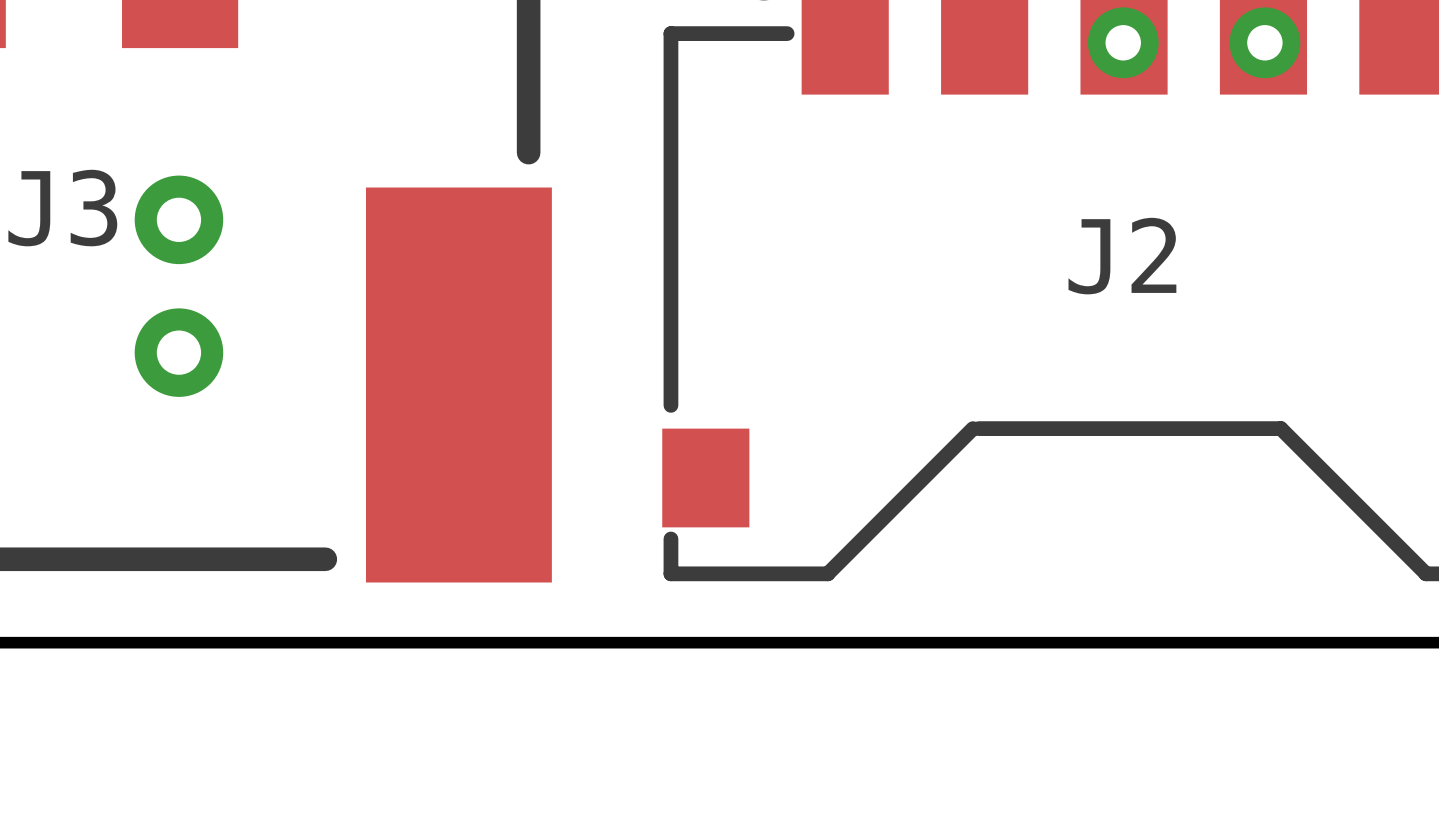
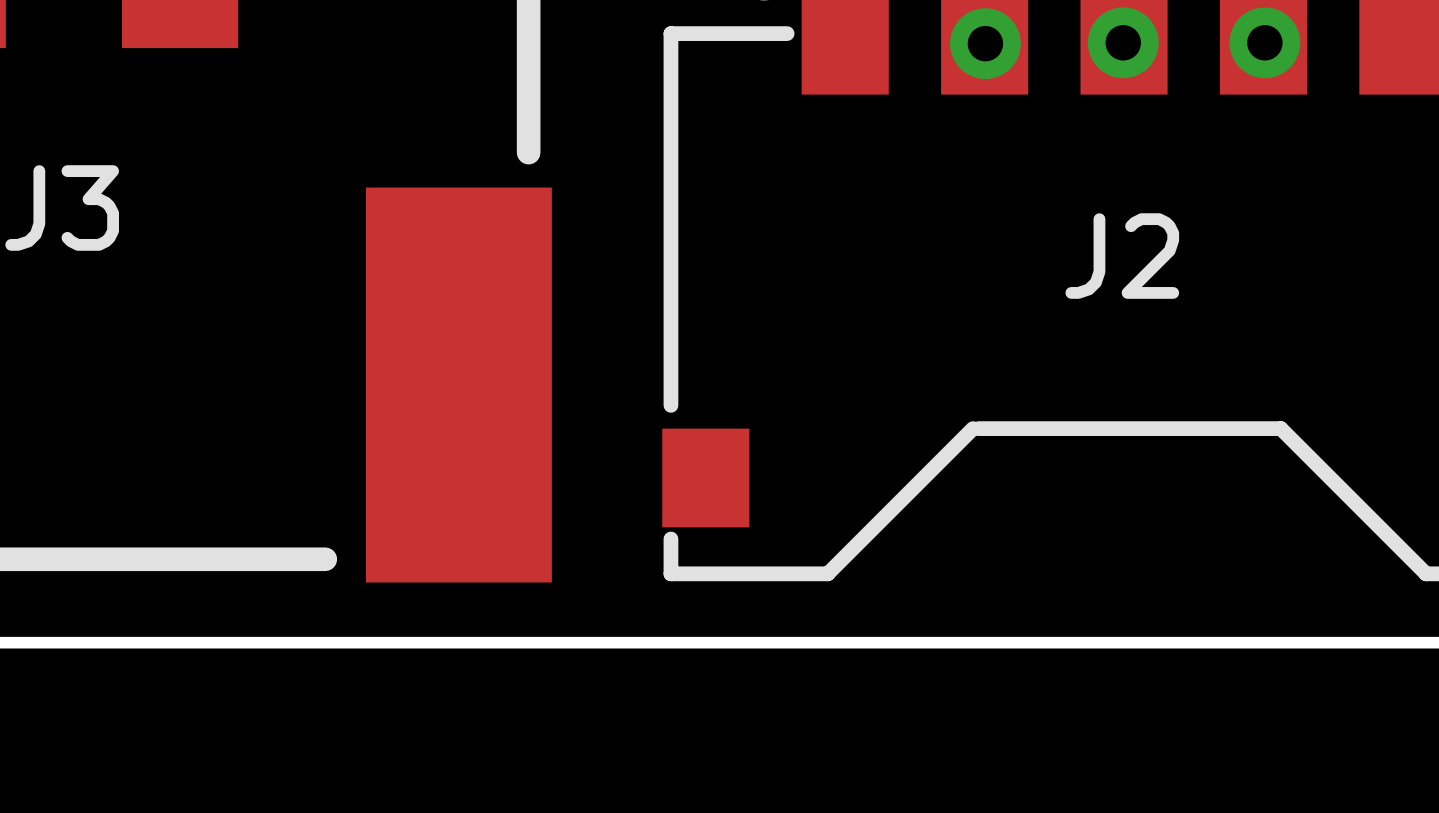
via: none -> (985, 43)
via: (178, 219) -> none
via: (178, 352) -> none

